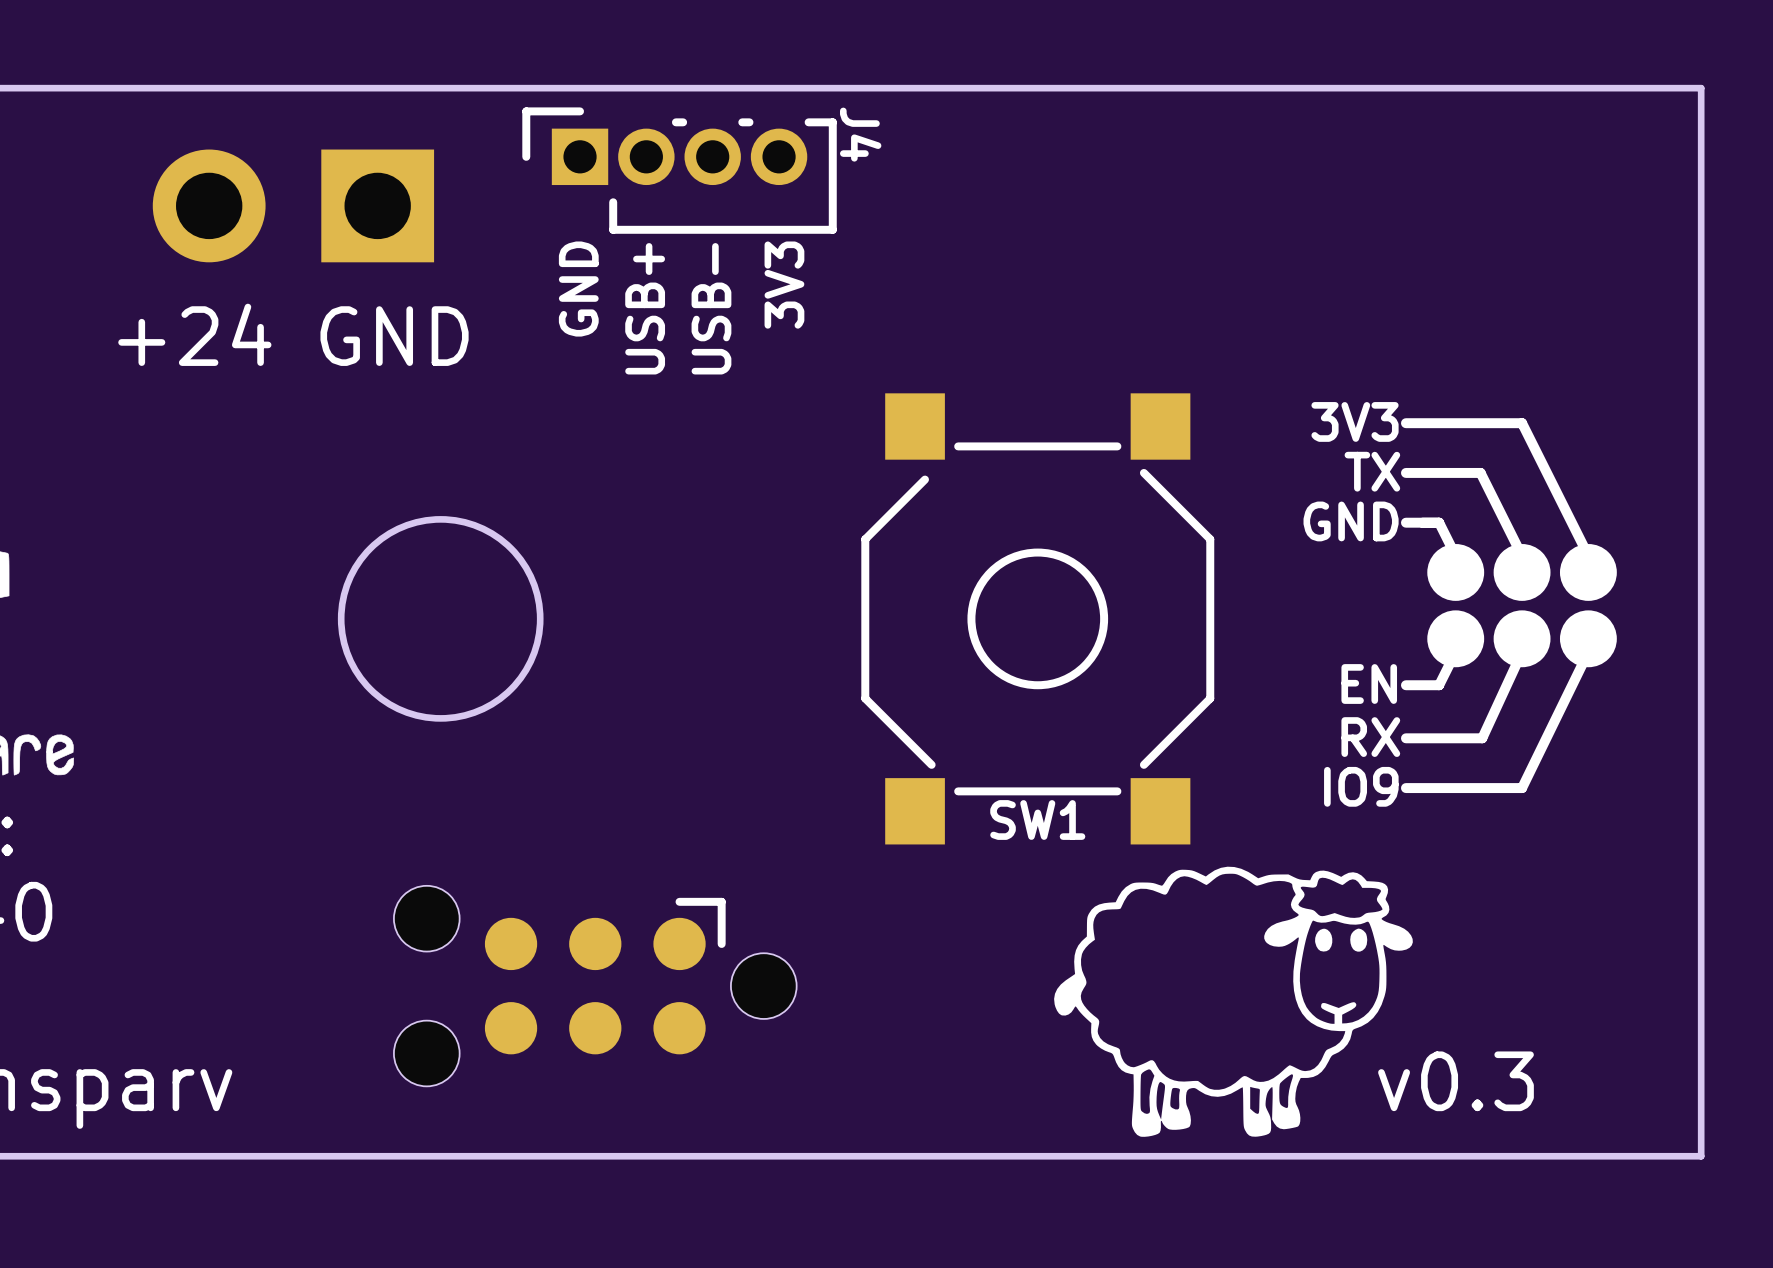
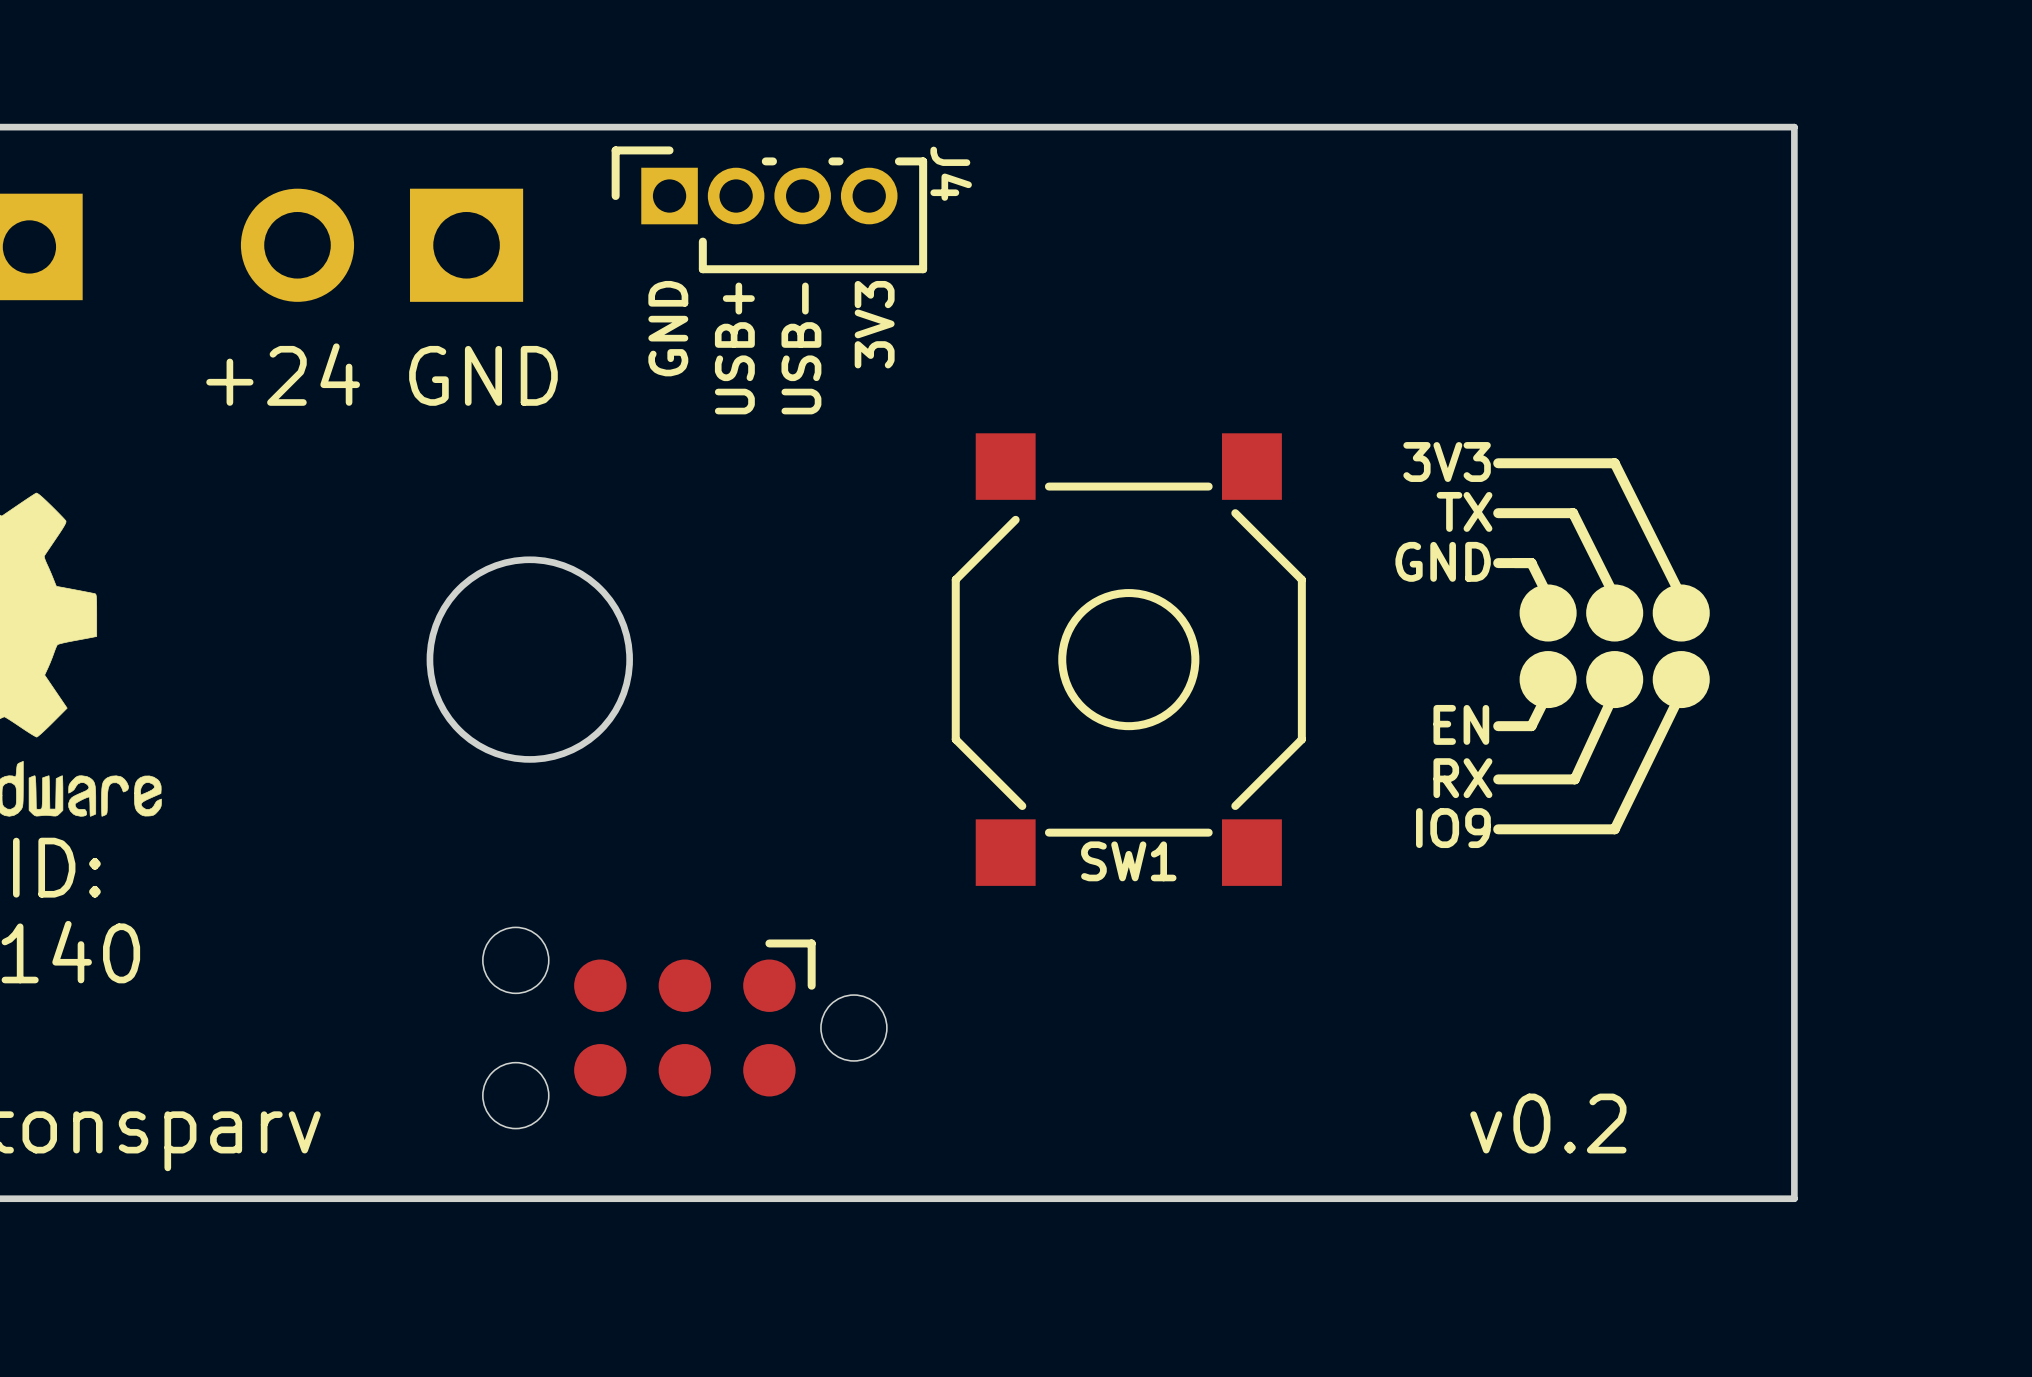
drawing: [1054, 866, 1413, 1137] -> none
text: v0.3 (1455, 1081) -> v0.2 (1548, 1123)

